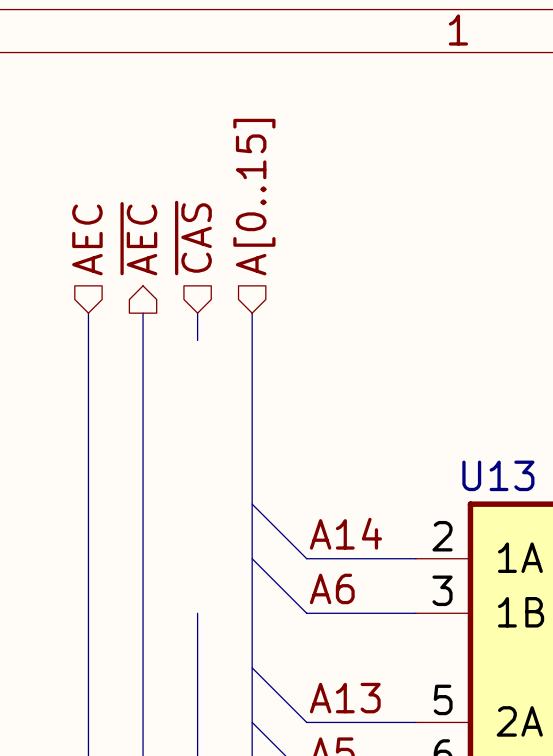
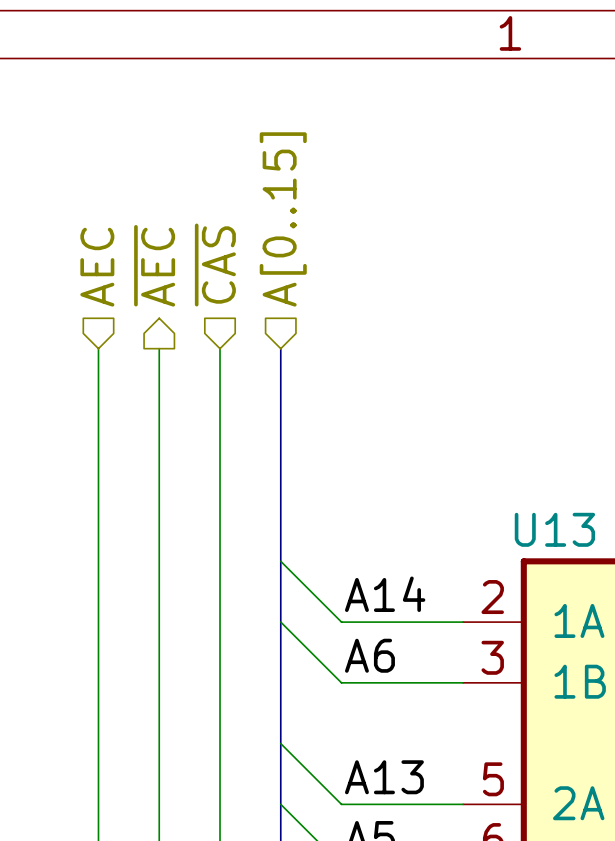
wire: none -> (220, 379) (220, 682)

